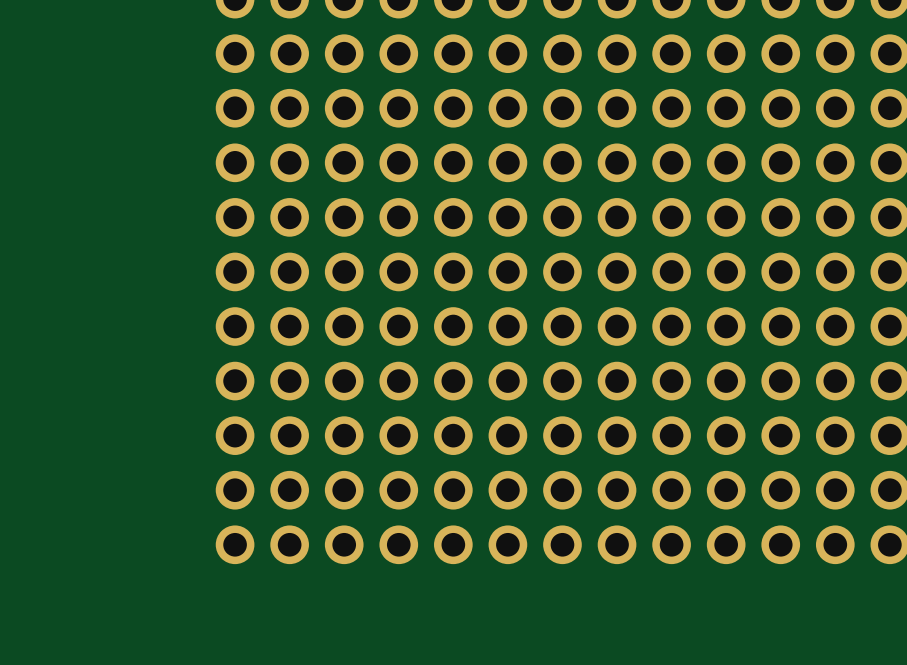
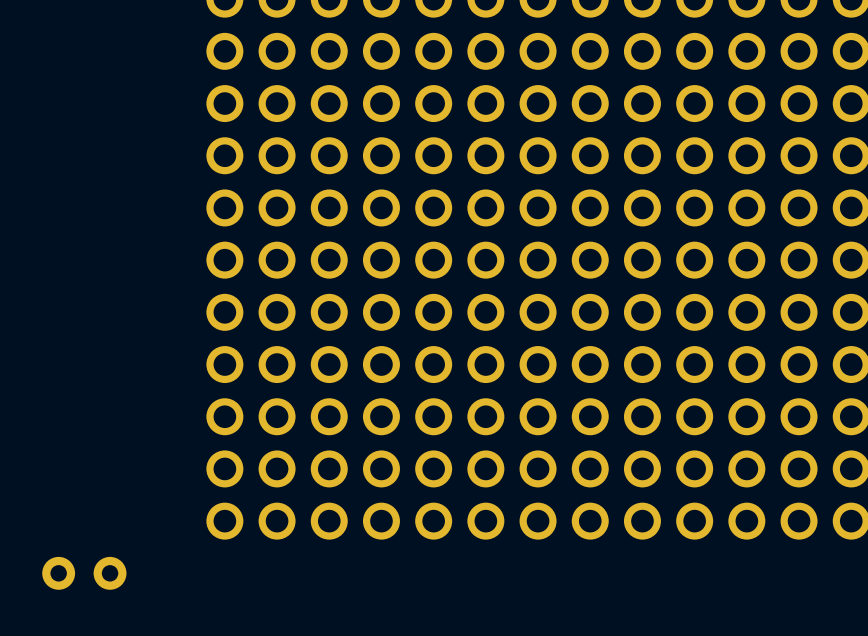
part: none -> (84, 573)

